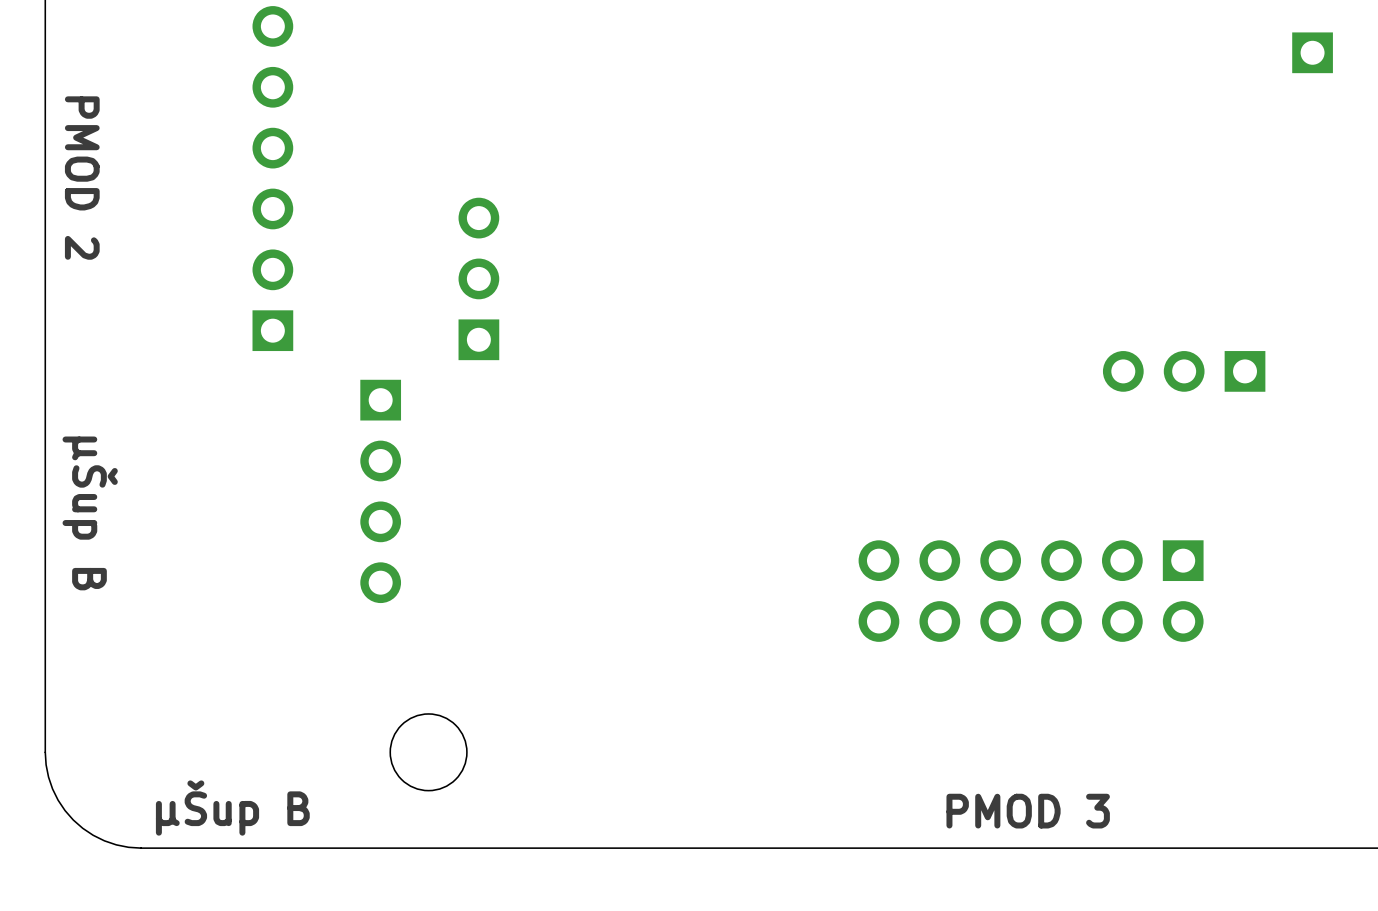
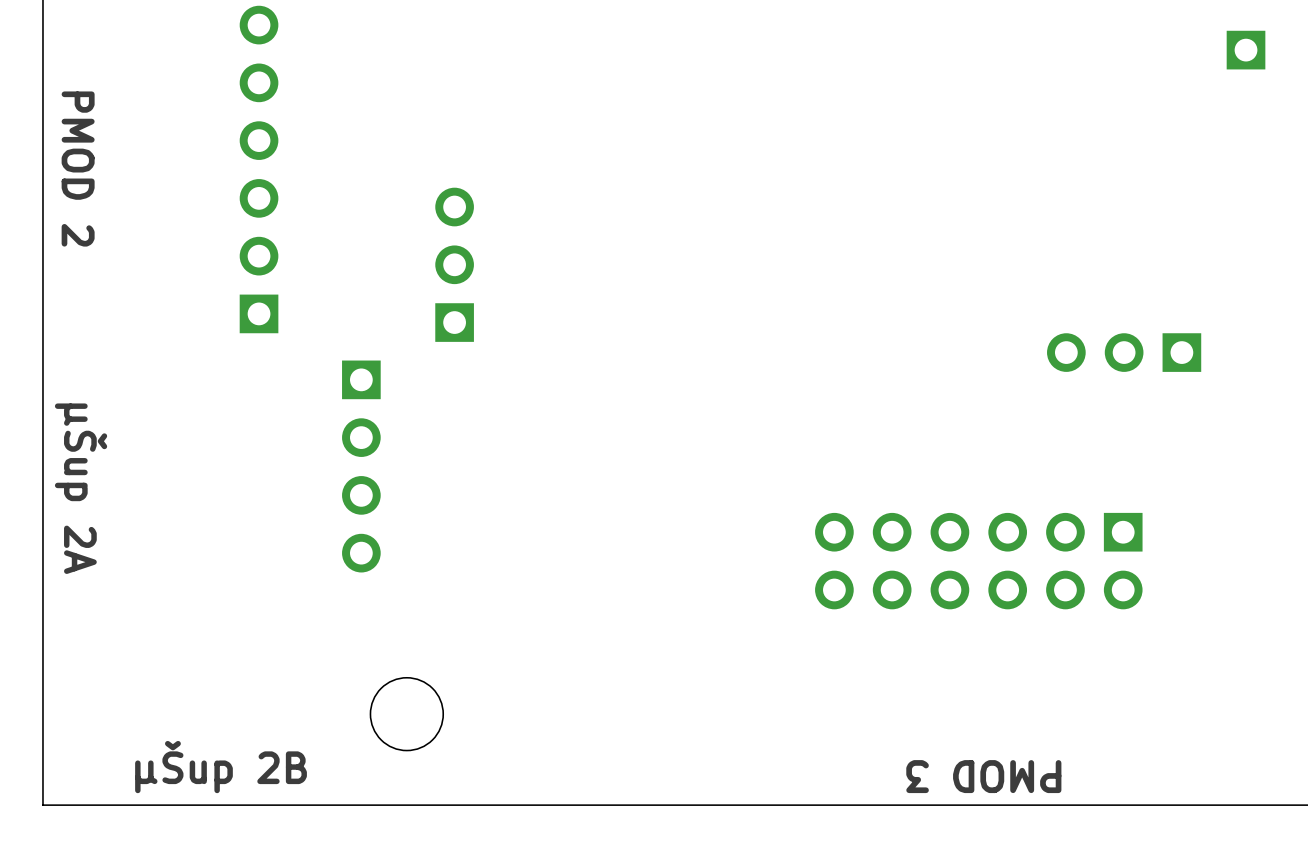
text: µŠup B (90, 513) -> µŠup 2A (81, 488)
board edge: (45, 752) (48, 777) (52, 788) (58, 800) (73, 820) (93, 835) (104, 840) (128, 847) (141, 848) -> (42, 714) (42, 805) (133, 805)
text: µŠup B (232, 808) -> µŠup 2B (221, 767)
text rotation: 0° (1028, 811) -> 180° (983, 776)

